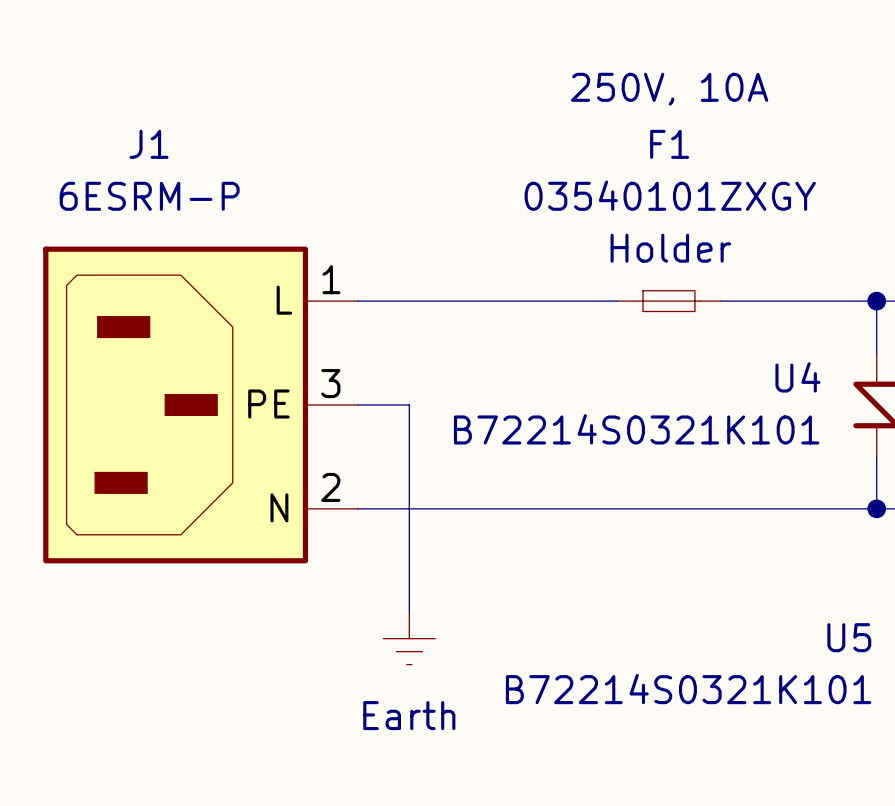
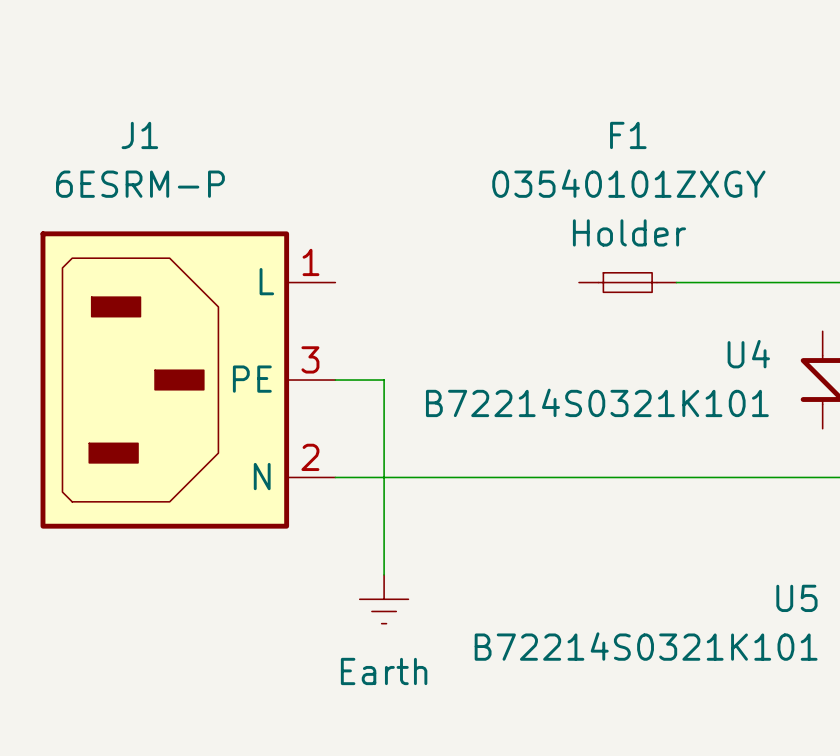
text: 250V, 10A (669, 89) -> none
wire: (357, 301) (617, 301) -> none
wire: (876, 301) (876, 353) -> none
junction: (876, 301) -> none
wire: (876, 456) (876, 508) -> none
junction: (876, 508) -> none

